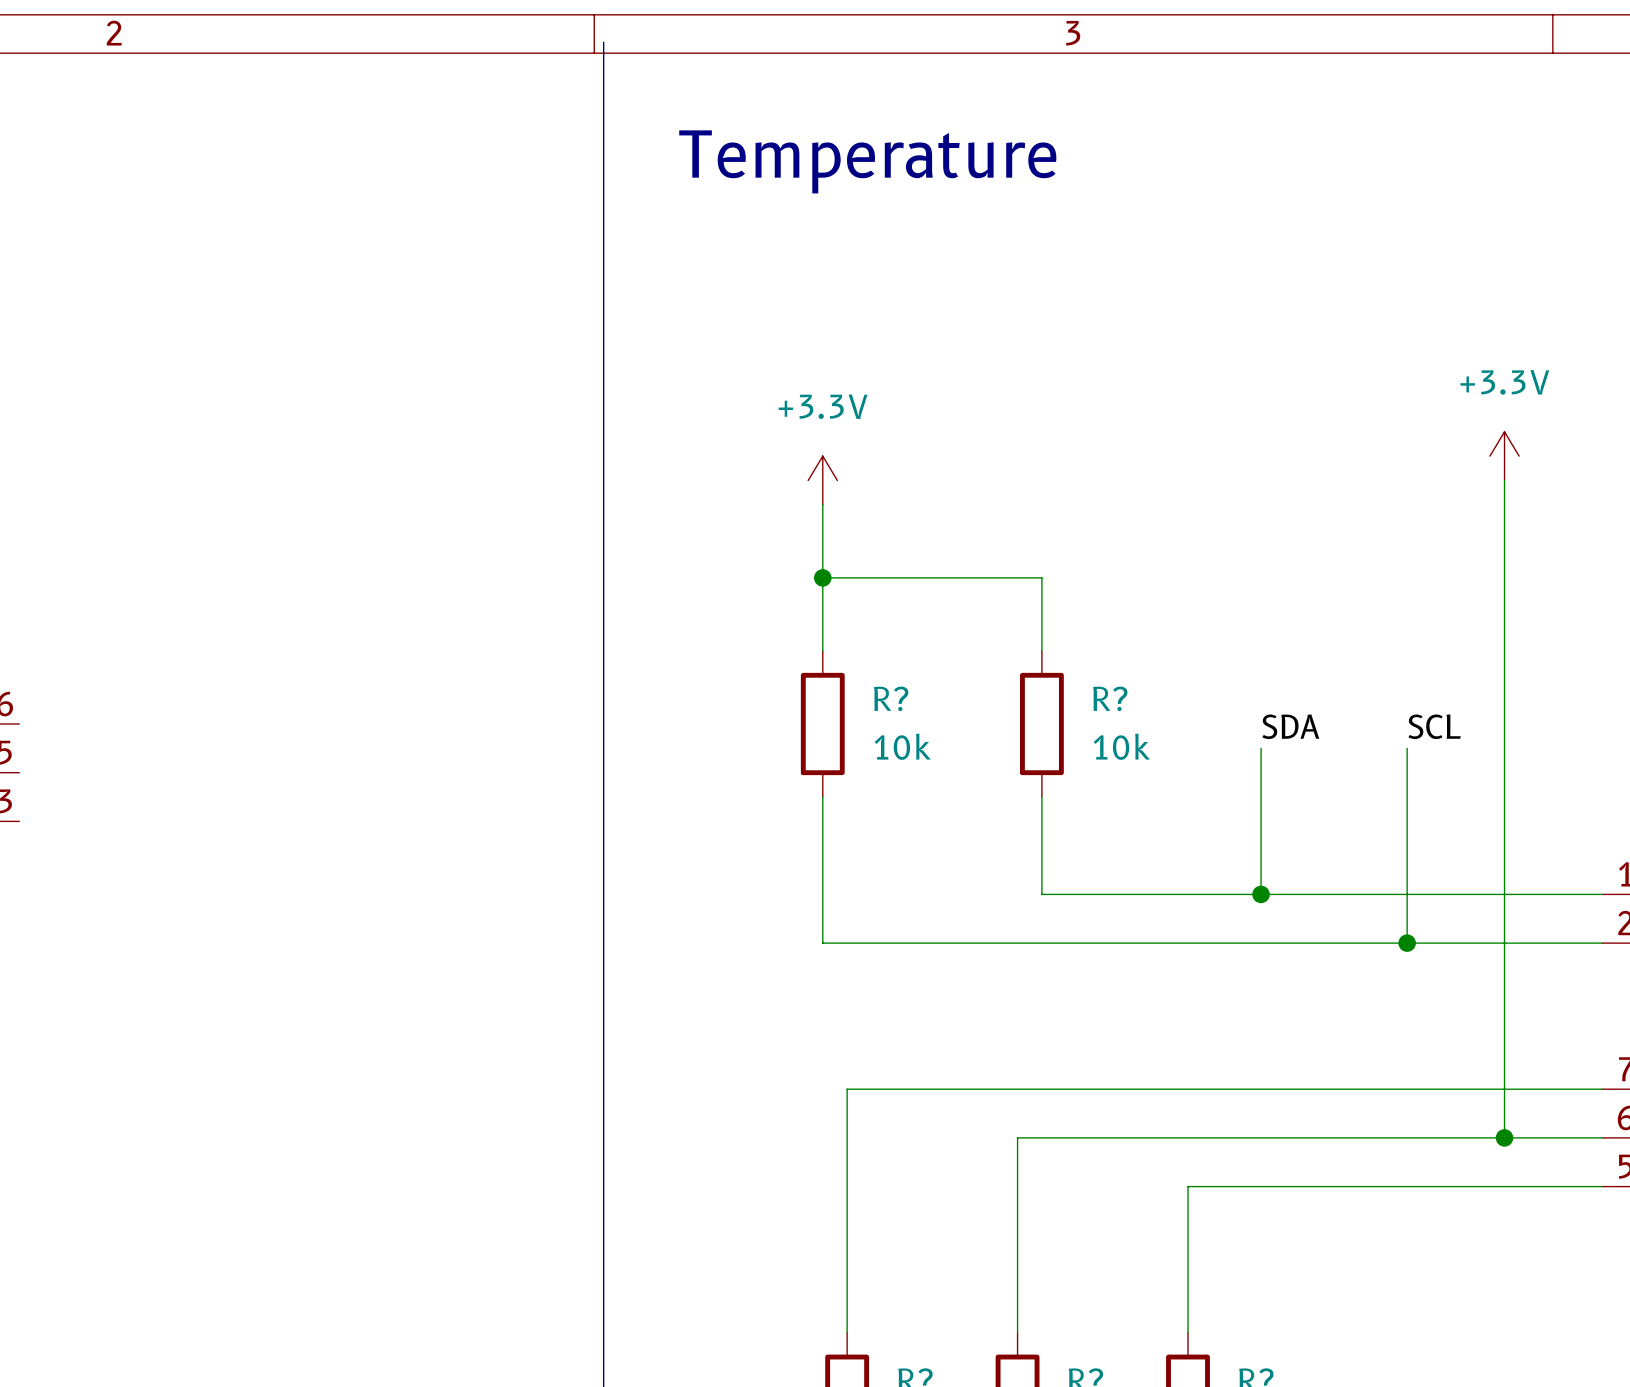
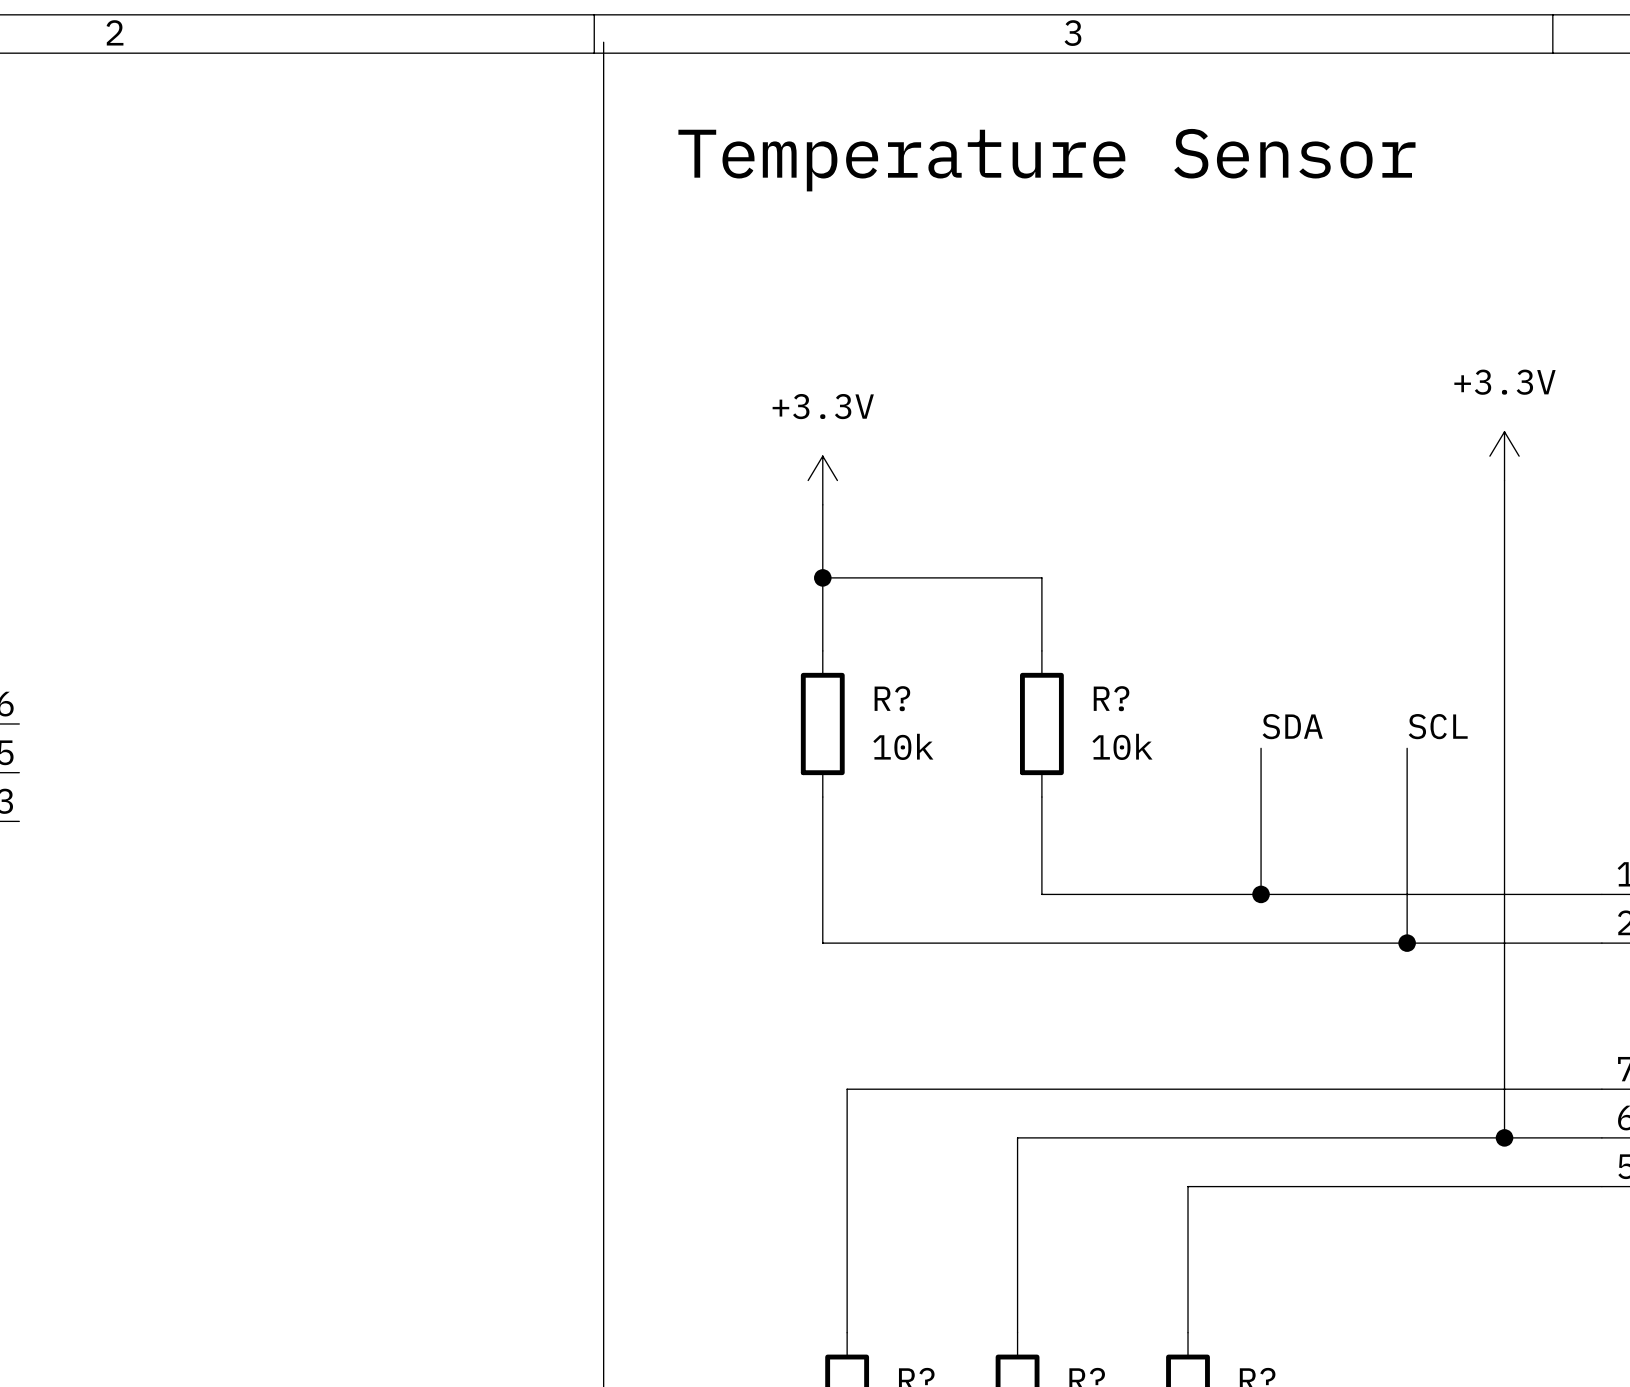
text: Temperature (867, 161) -> Temperature Sensor (1046, 160)

